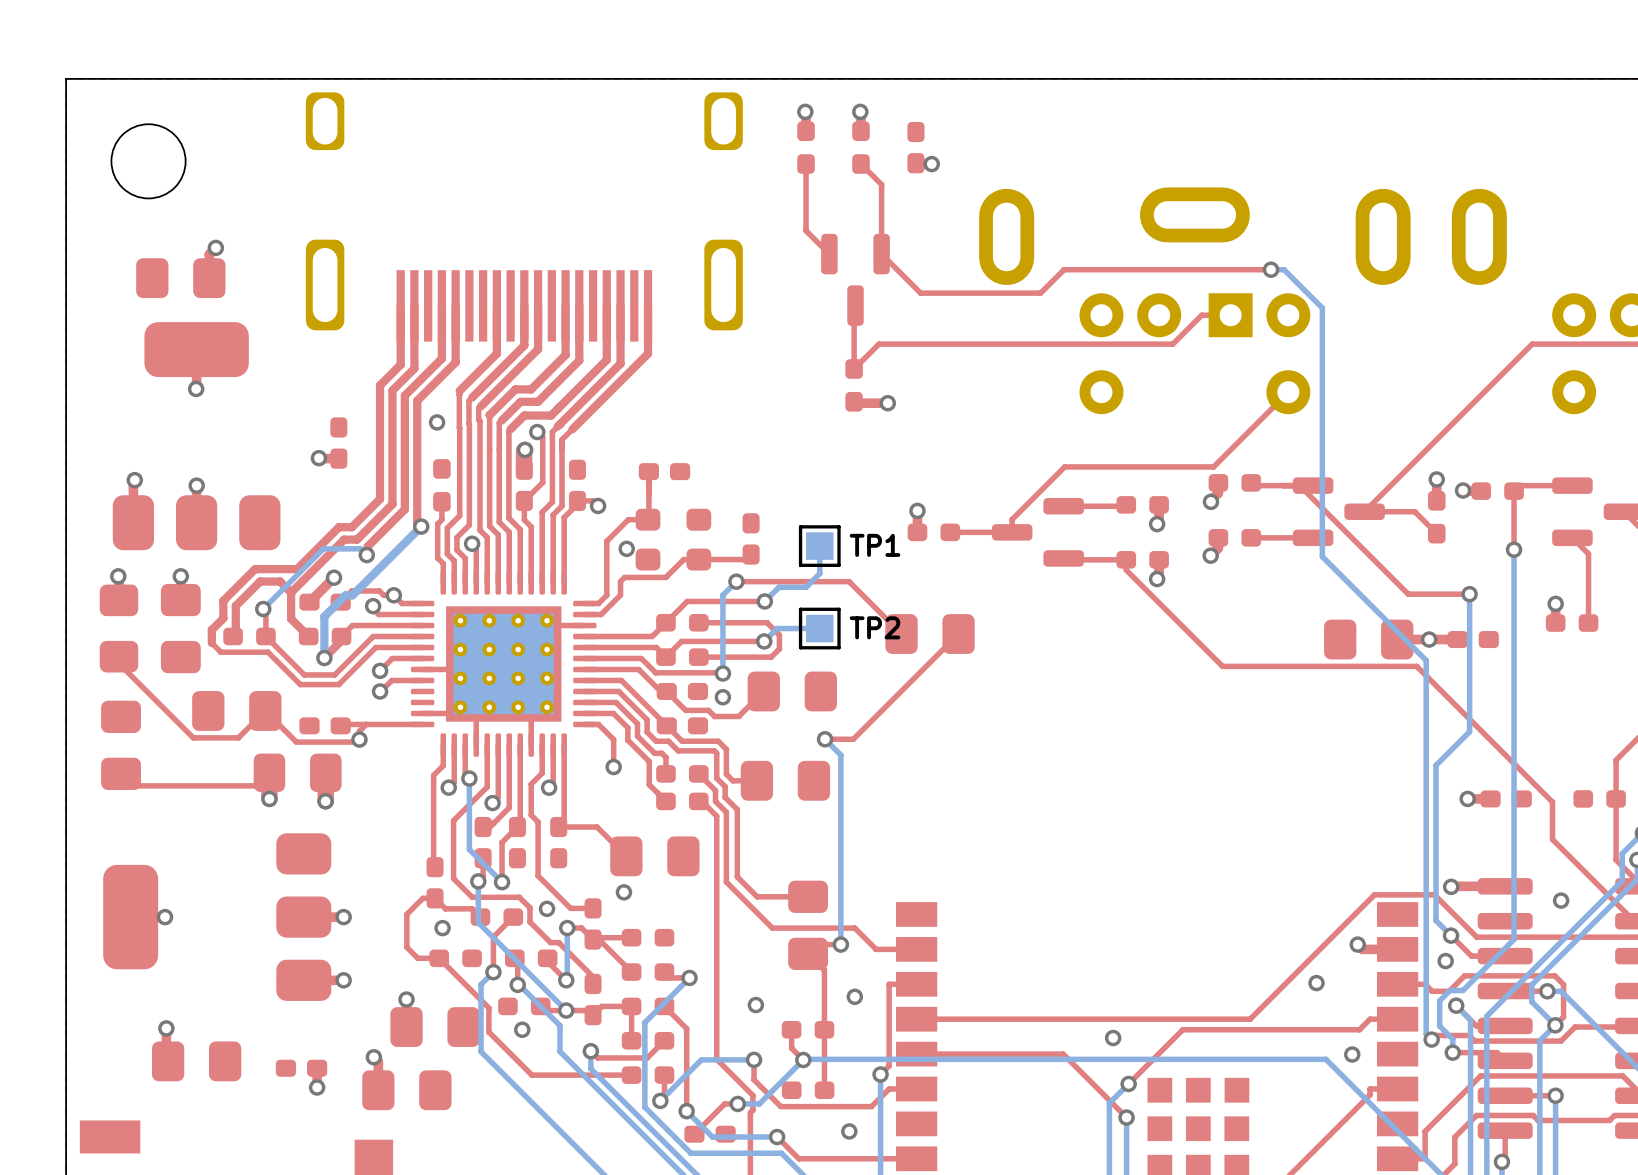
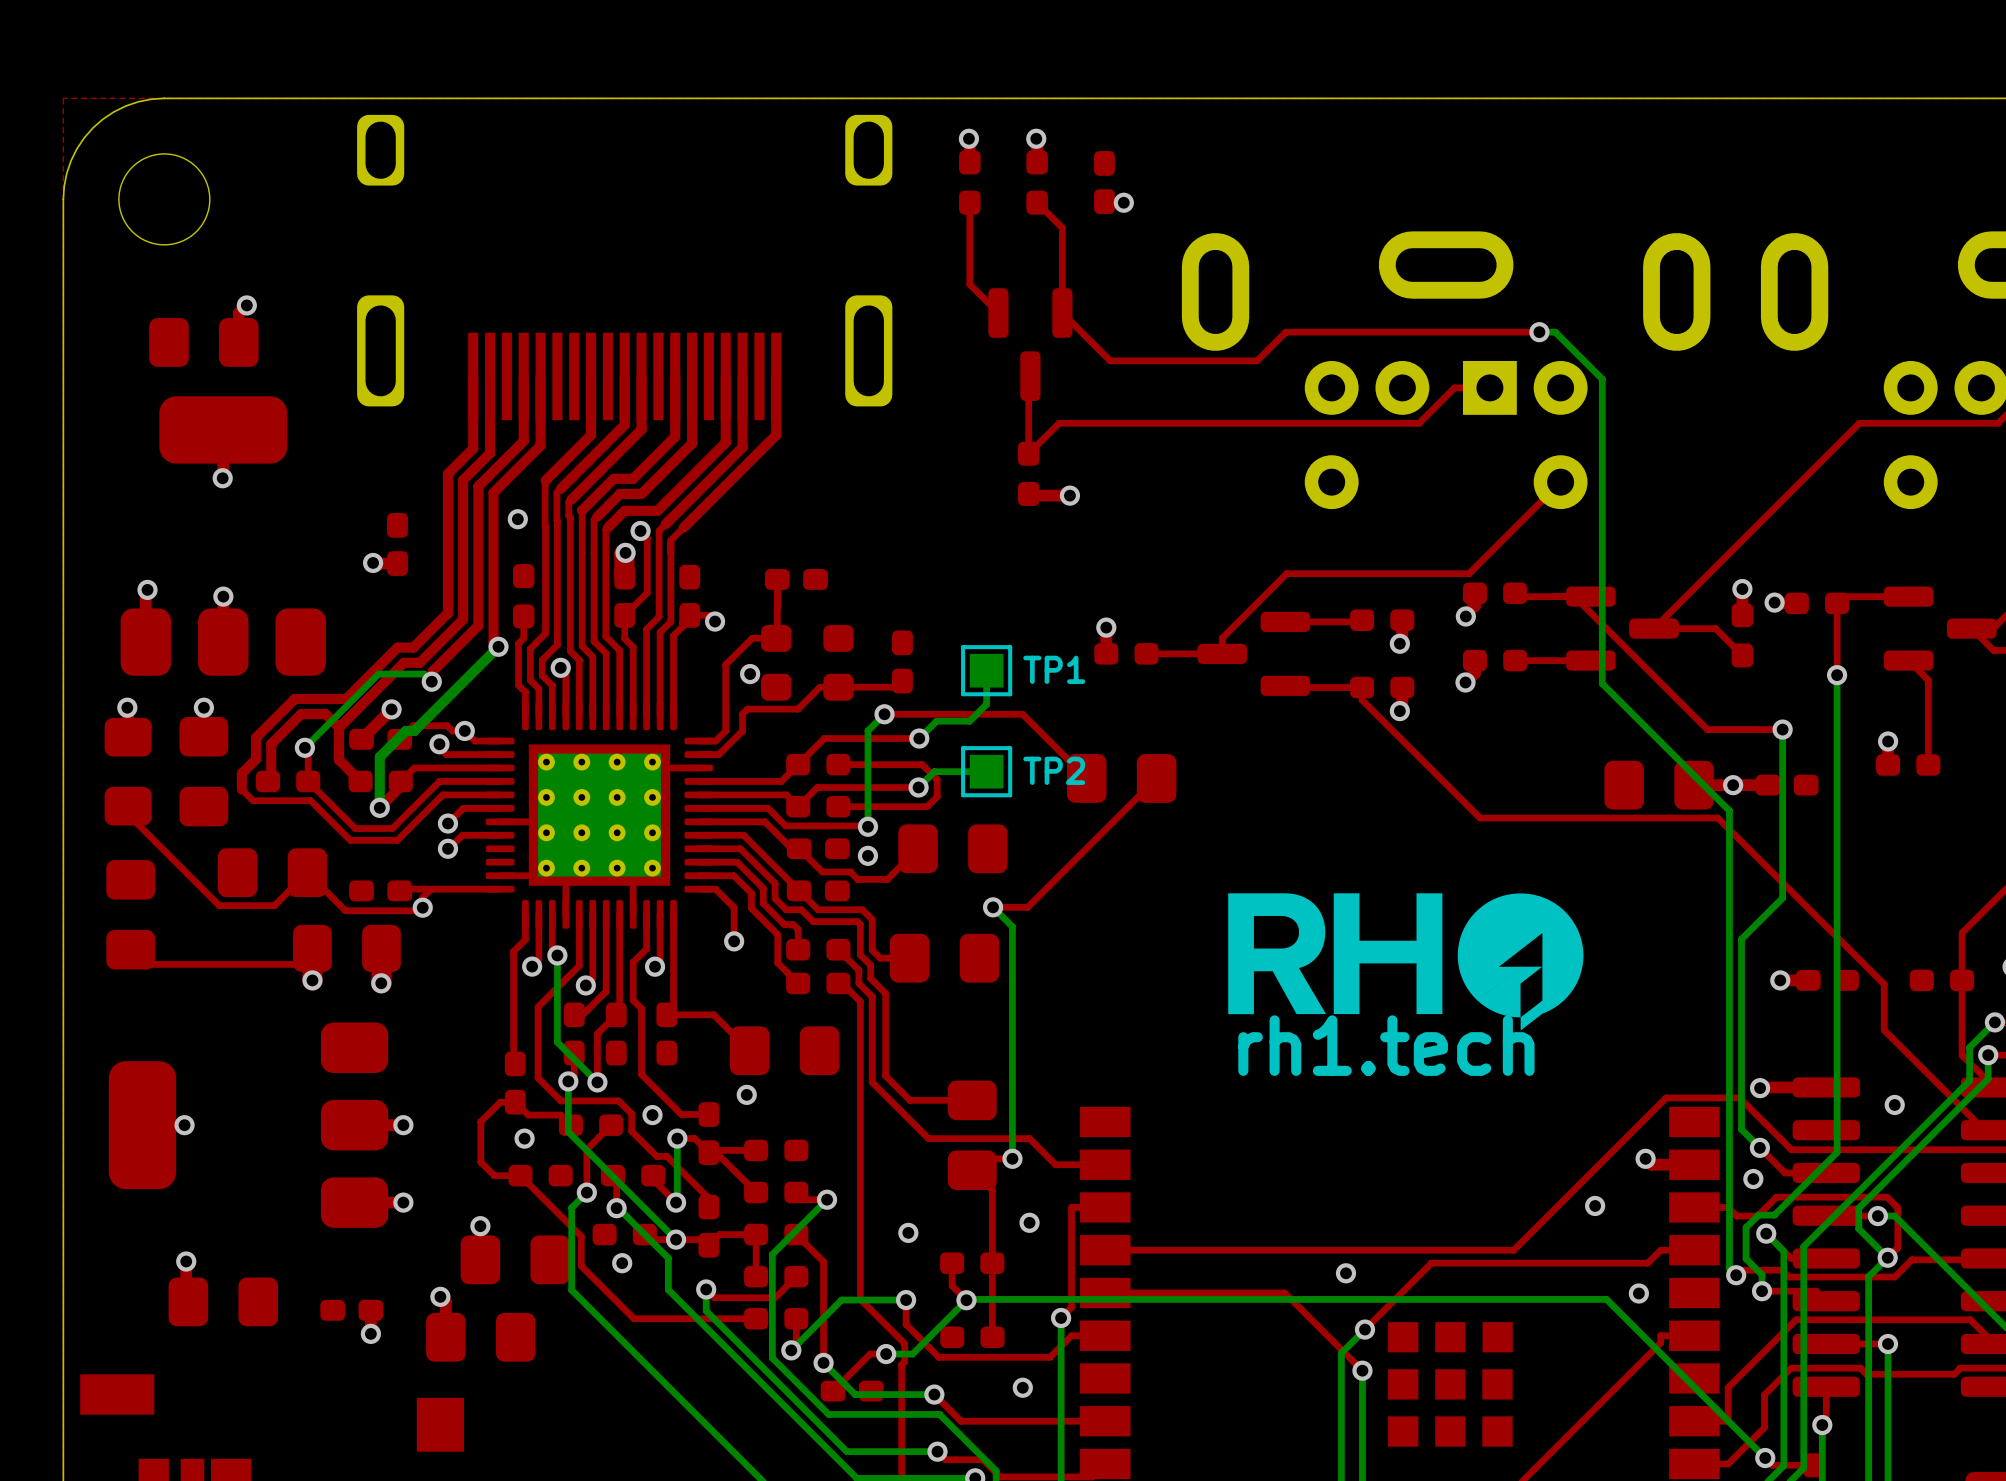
board edge: (148, 78) (66, 78) (66, 161) -> (164, 98) (138, 101) (125, 106) (102, 119) (92, 127) (84, 137) (71, 160) (66, 173) (63, 199)
drawing: none -> [1228, 893, 1584, 1031]
text: none -> rh1.tech (1386, 1045)

